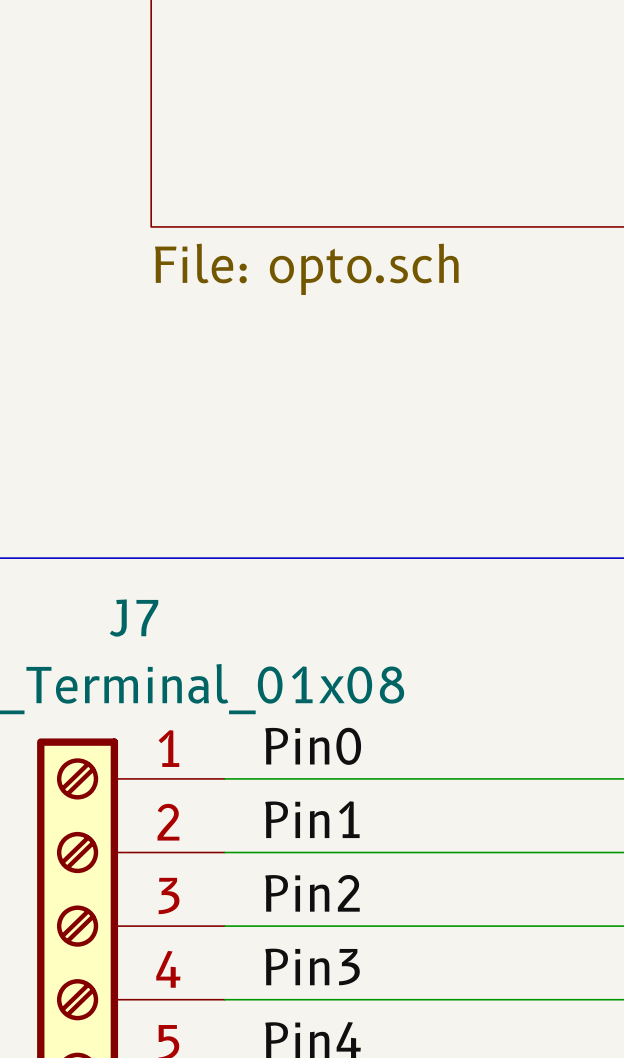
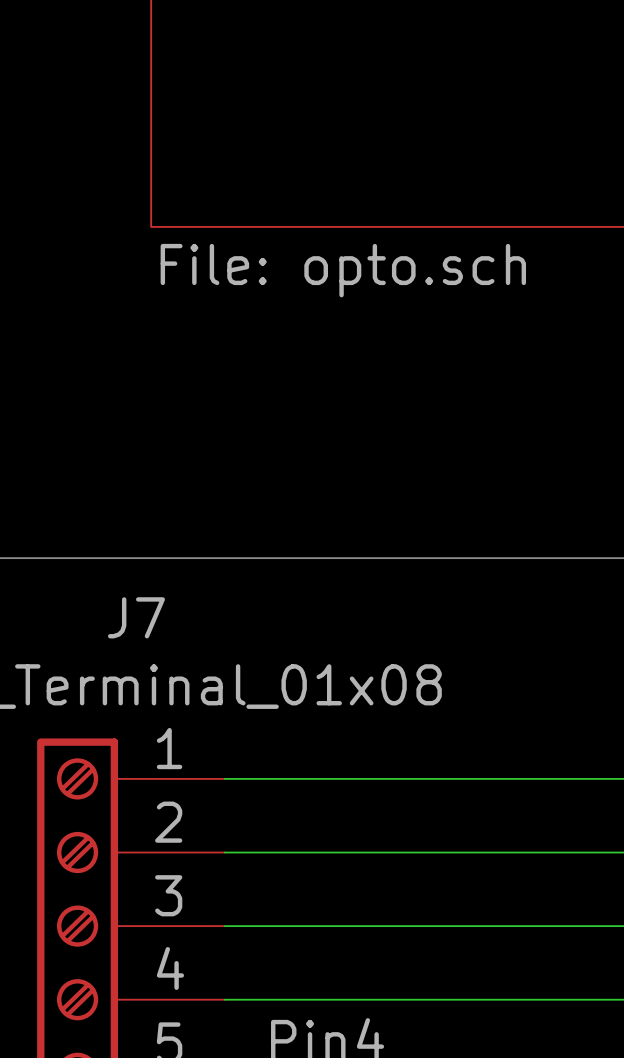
label: Pin0 (313, 746) -> none
label: Pin1 (312, 819) -> none
label: Pin2 (312, 893) -> none
label: Pin3 (312, 966) -> none

